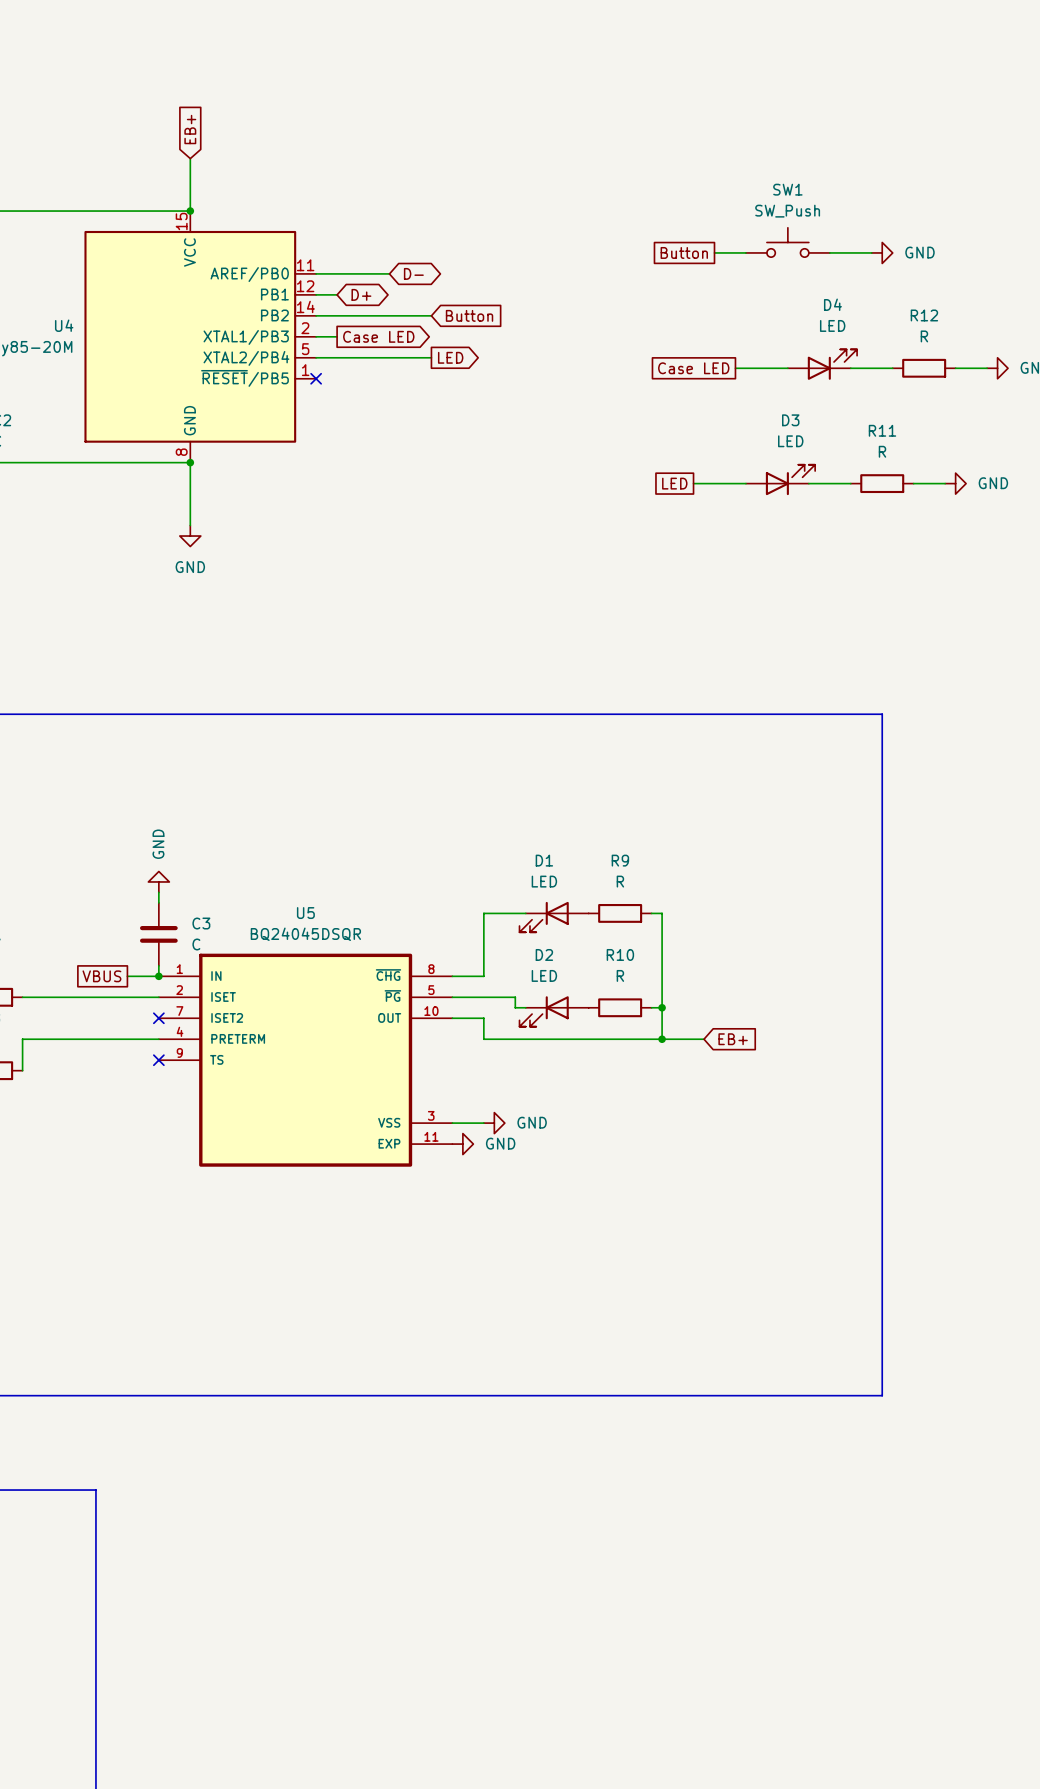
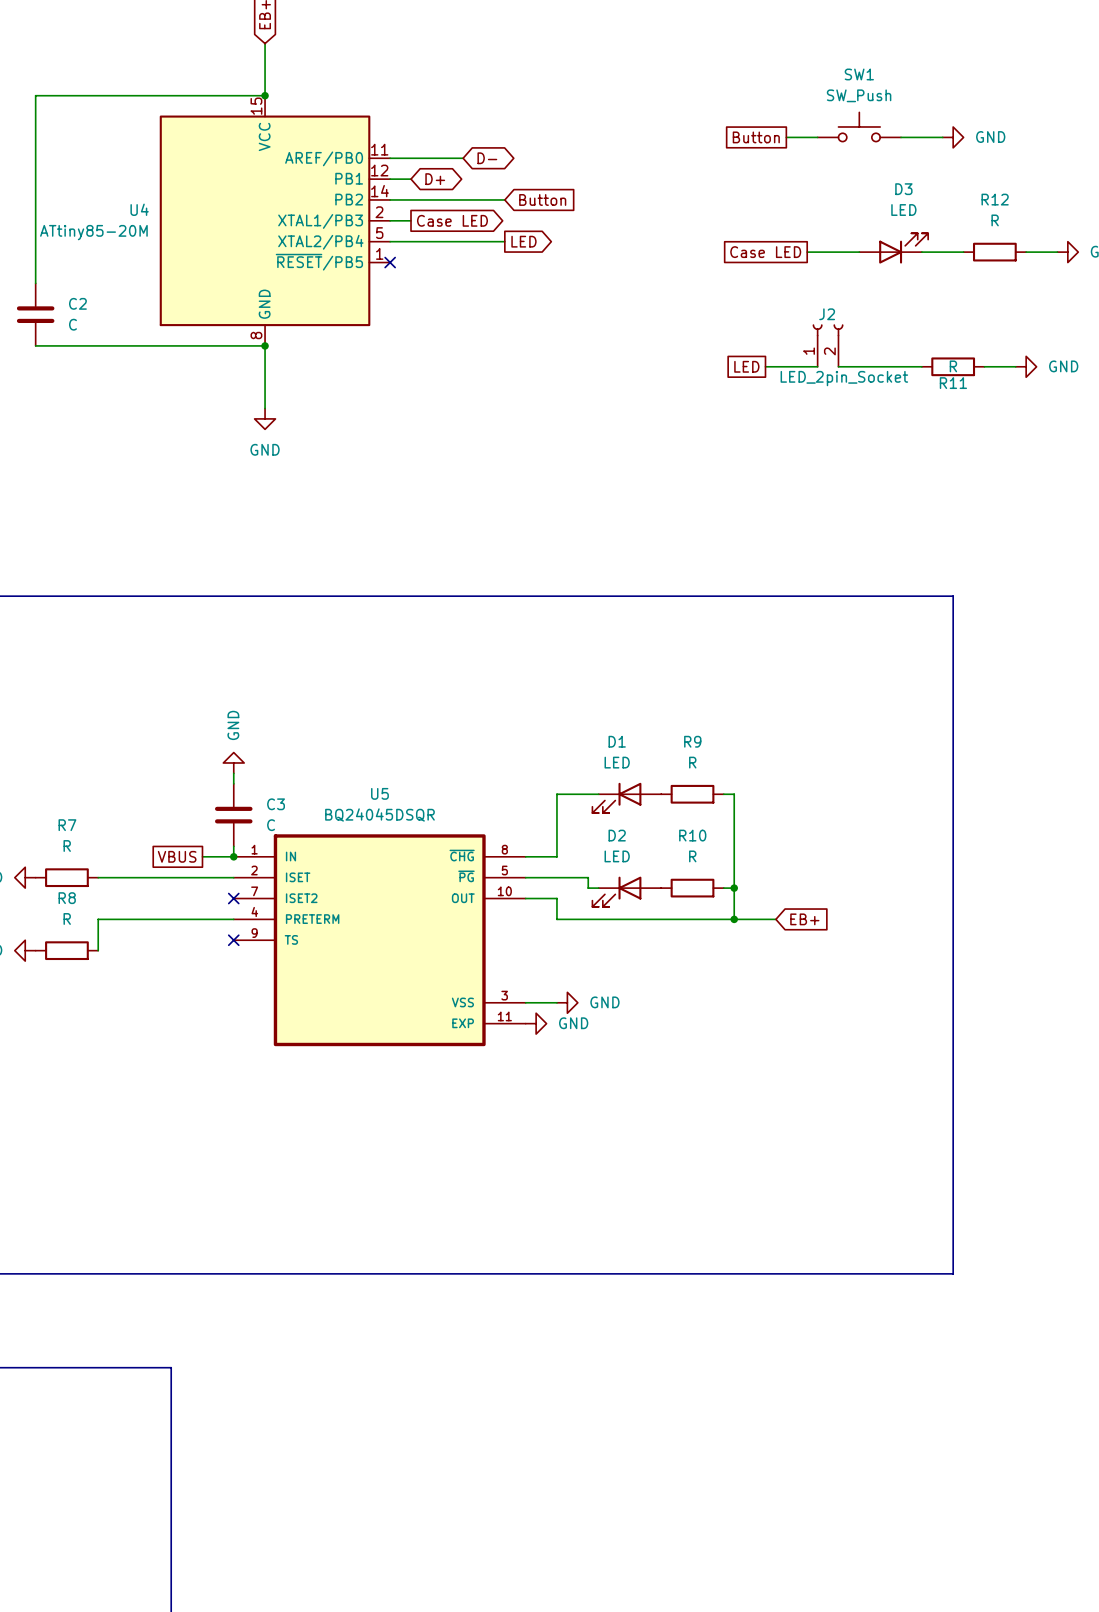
D4 name: D4 (832, 304) -> D3 (903, 189)
R11 name position: R11 (882, 430) -> R11 (953, 383)
R11 value position: R (882, 451) -> R (953, 366)
J2: none -> LED_2pin_Socket (828, 345)
D3: LED (780, 479) -> none

